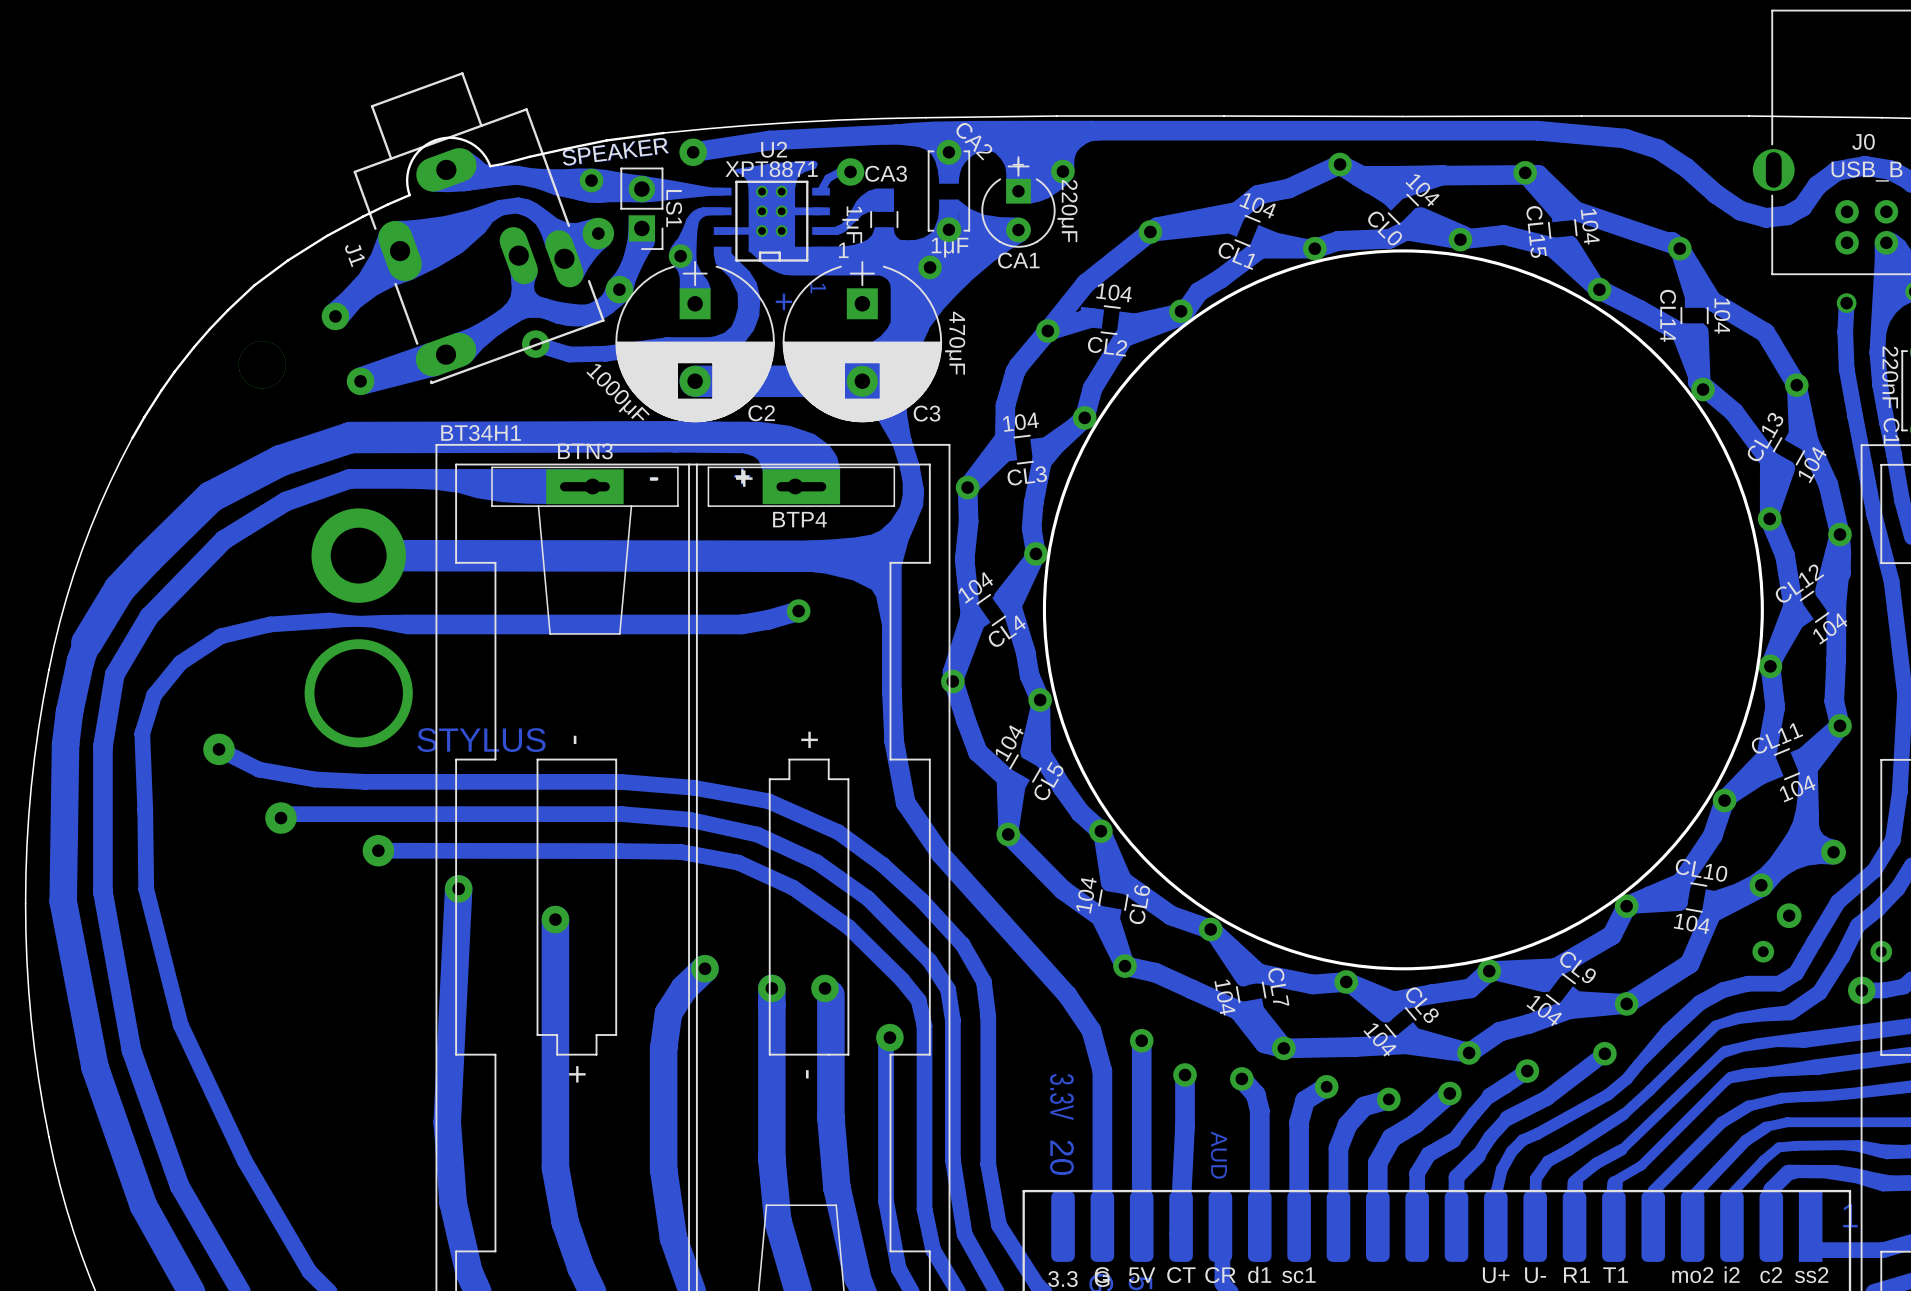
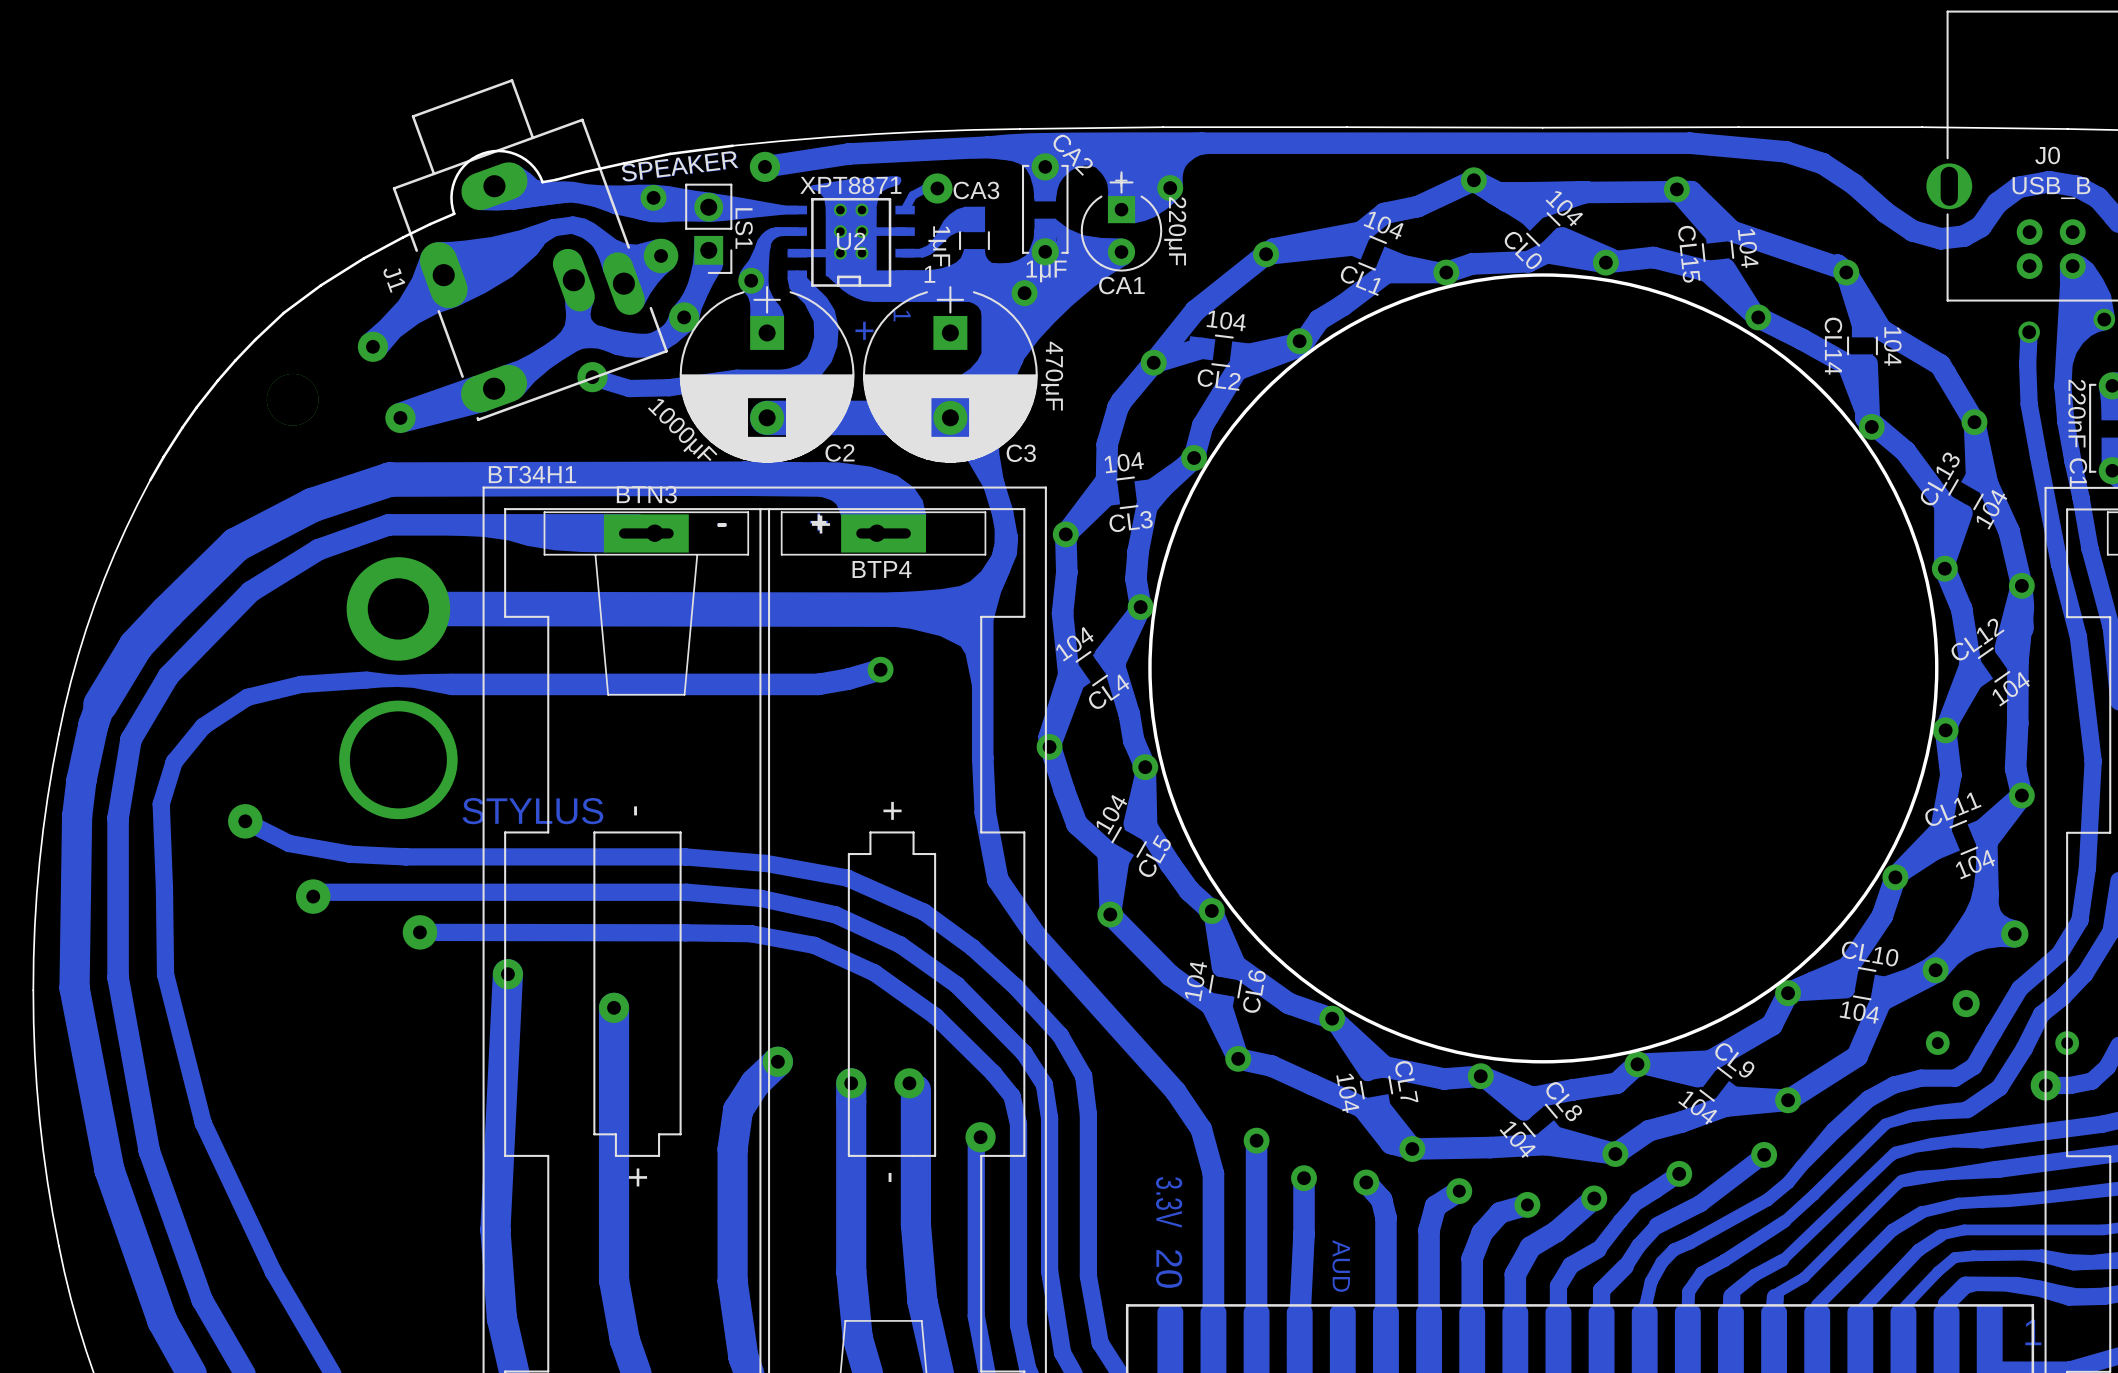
U2 name position: U2 (774, 149) -> U2 (851, 241)

